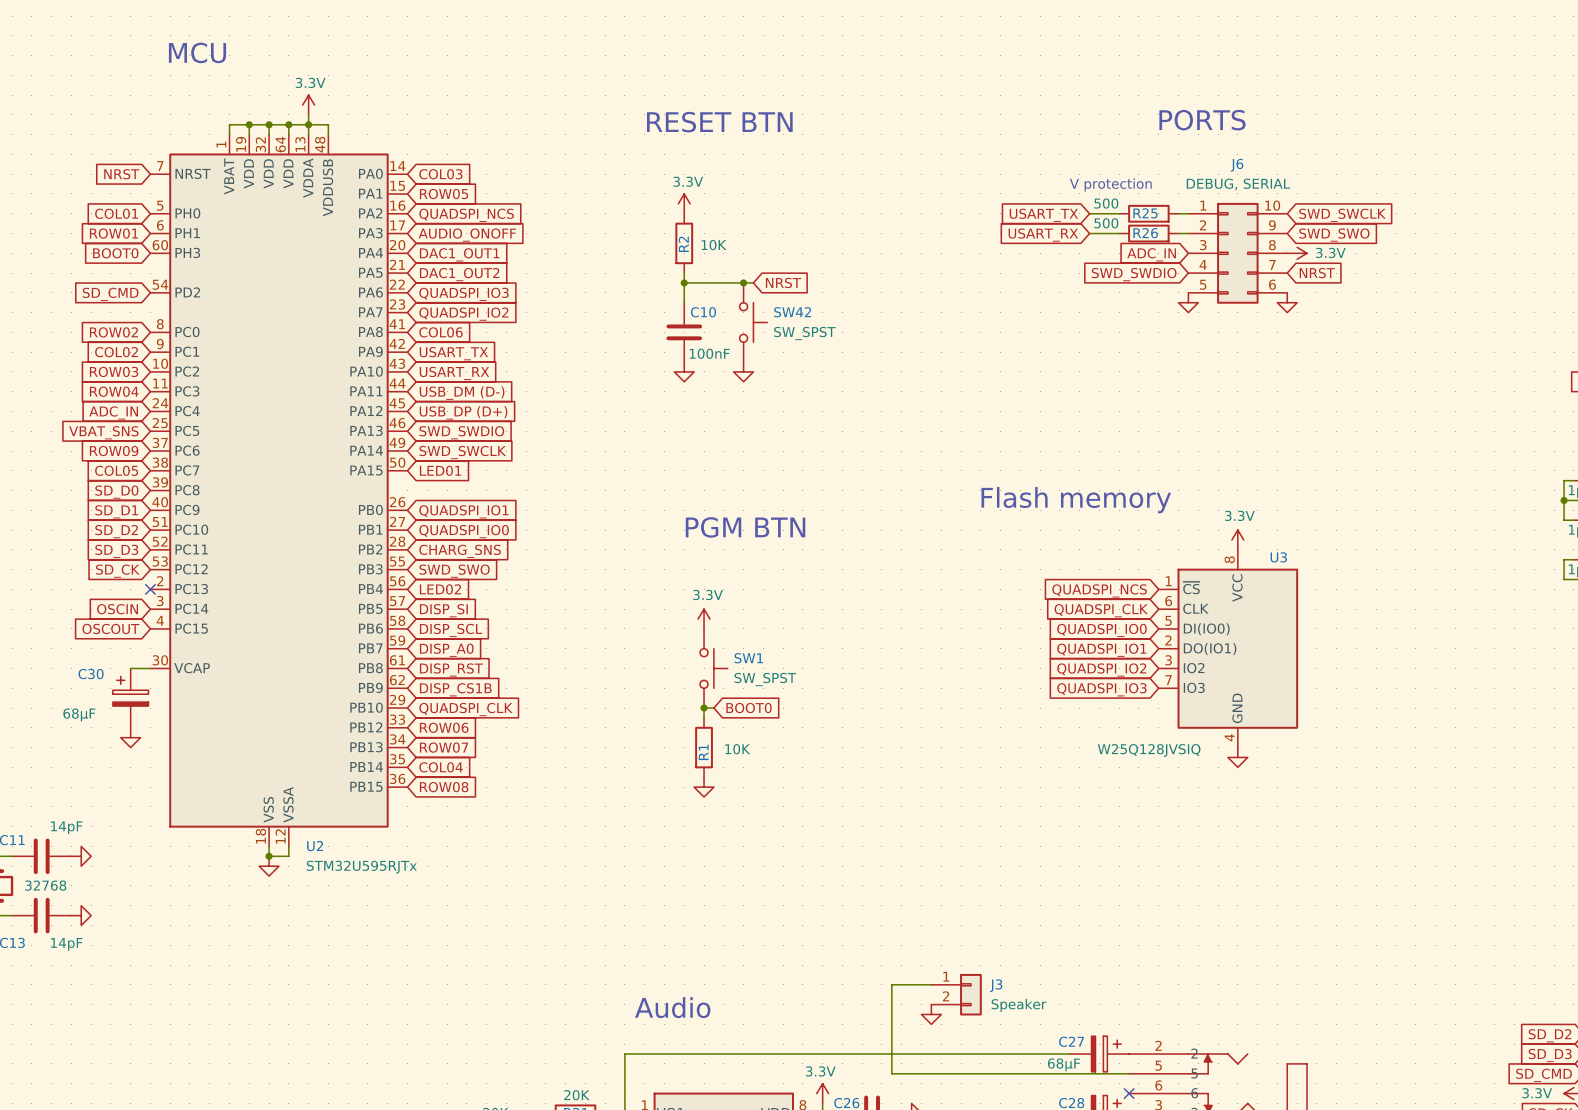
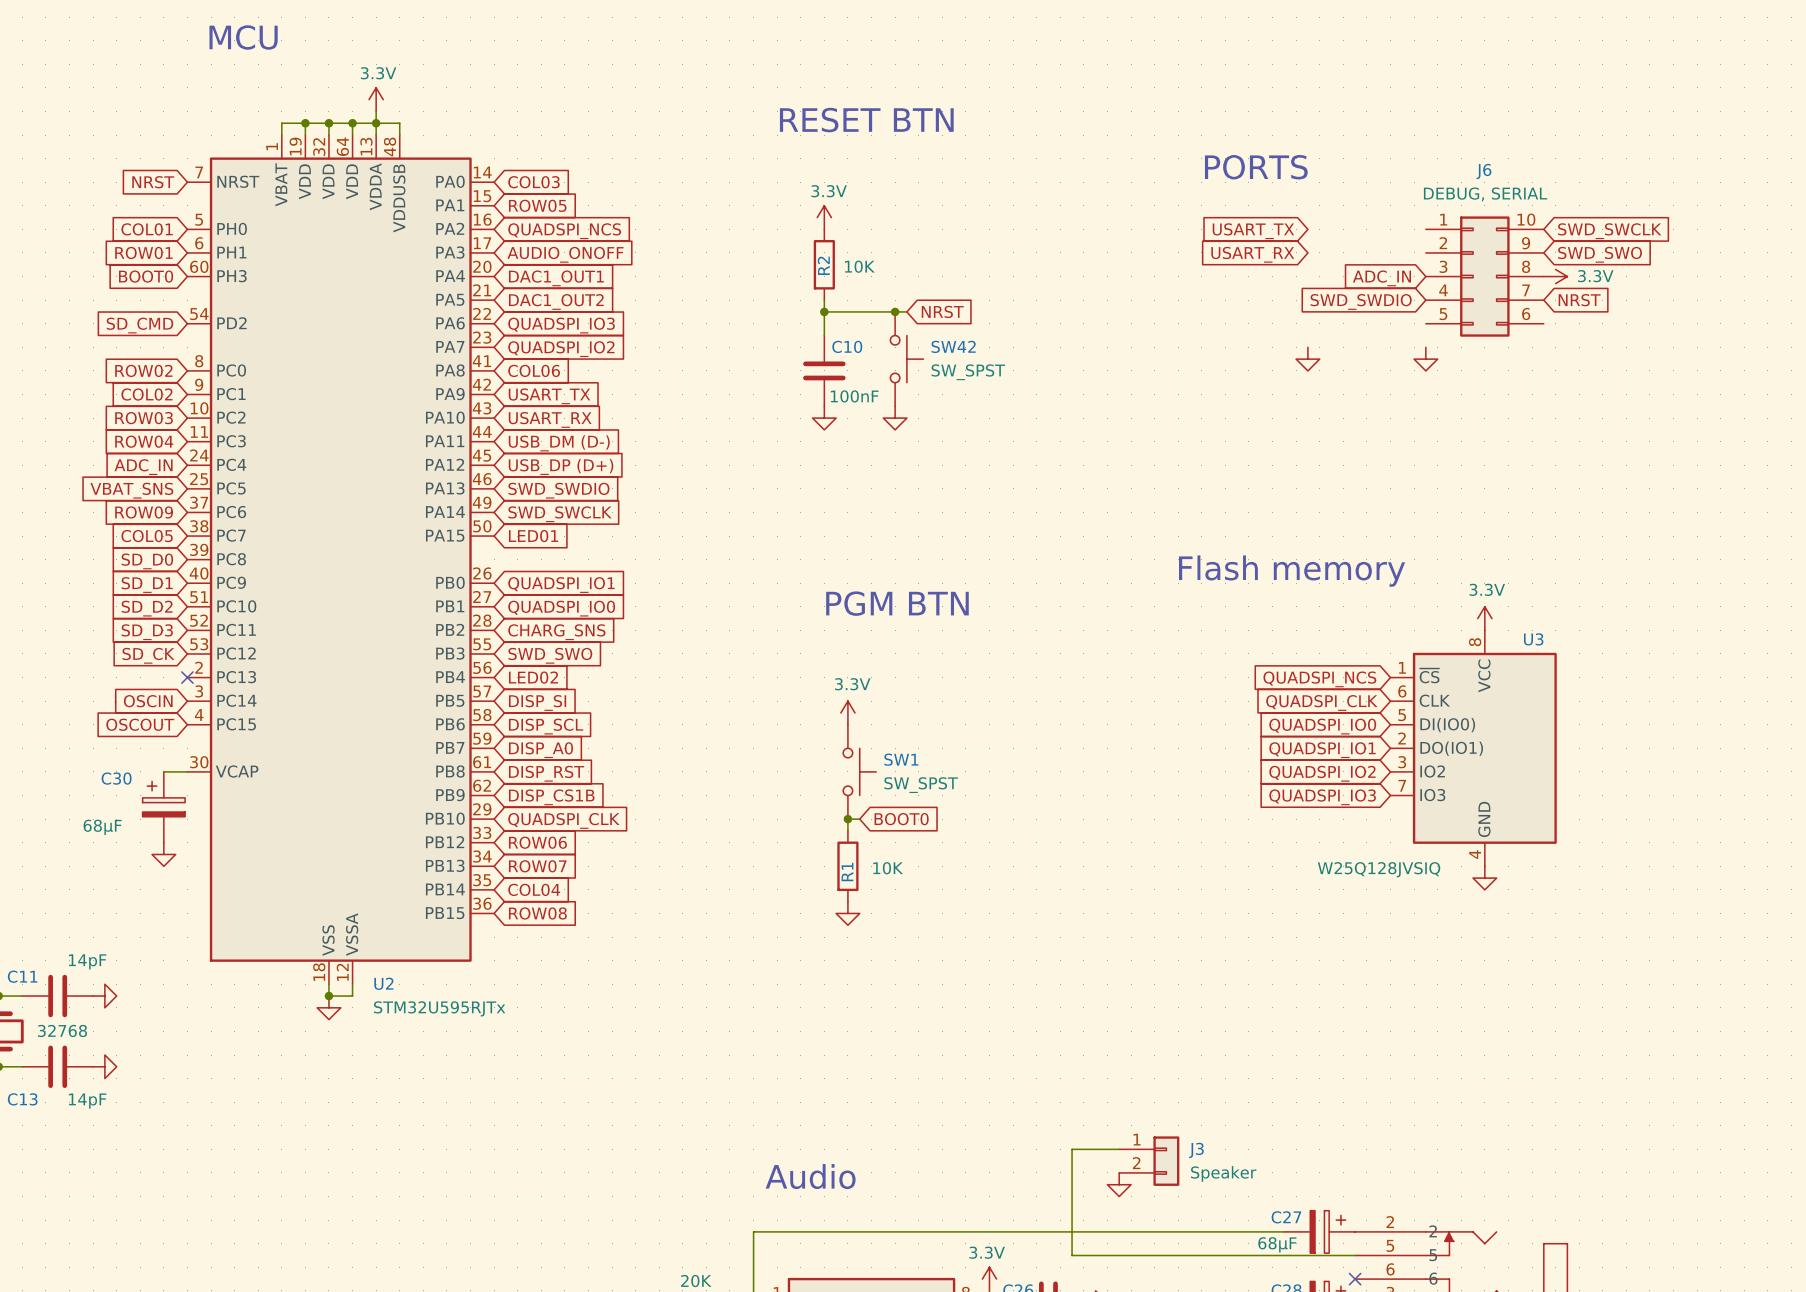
text position: PORTS (1202, 120) -> PORTS (1256, 167)
text: V protection (1110, 184) -> none
wire: (1089, 213) (1119, 213) -> none
R25: 500 (1148, 213) -> none
wire: (1178, 213) (1188, 213) -> none
wire: (1089, 233) (1119, 233) -> none
R26: 500 (1148, 233) -> none
wire: (1178, 233) (1188, 233) -> none
power symbol position: (1188, 302) -> (1425, 359)
power symbol: (1287, 302) -> none
power symbol: none -> (1307, 359)

